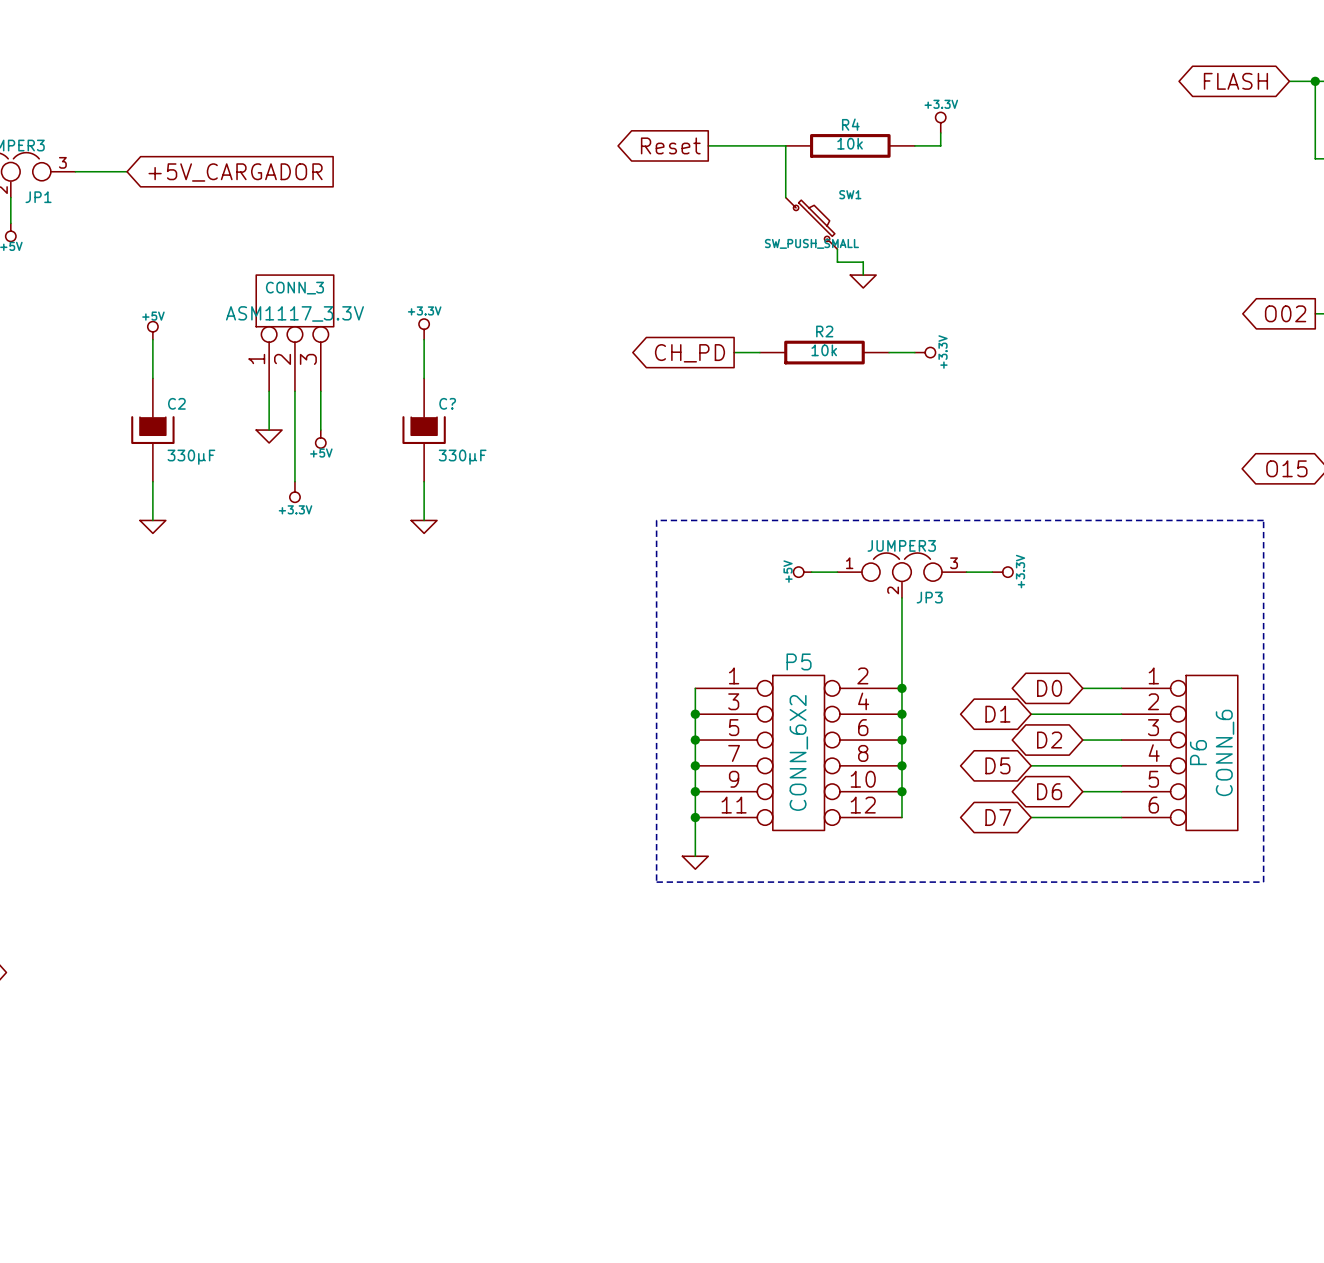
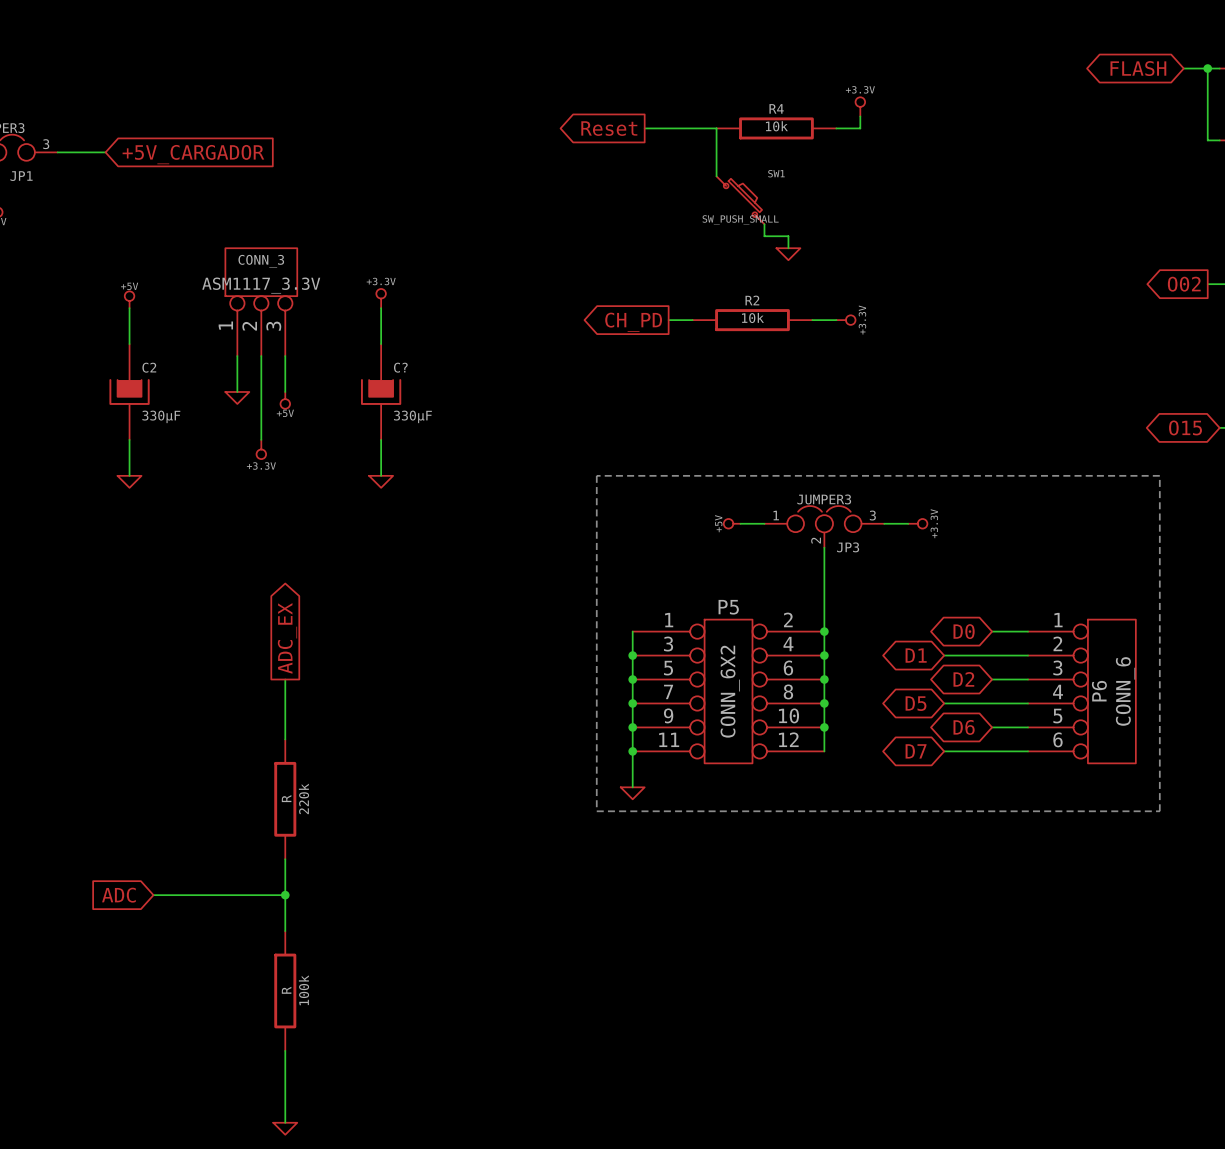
global label: none -> ADC_EX (287, 638)
wire: none -> (285, 679) (285, 739)
220k: none -> R (285, 799)
wire: none -> (285, 859) (285, 931)
global label: none -> ADC (118, 895)
wire: none -> (153, 895) (285, 895)
junction: none -> (285, 895)
100k: none -> R (285, 990)
wire: none -> (285, 1050) (285, 1122)
power symbol: none -> (285, 1128)

